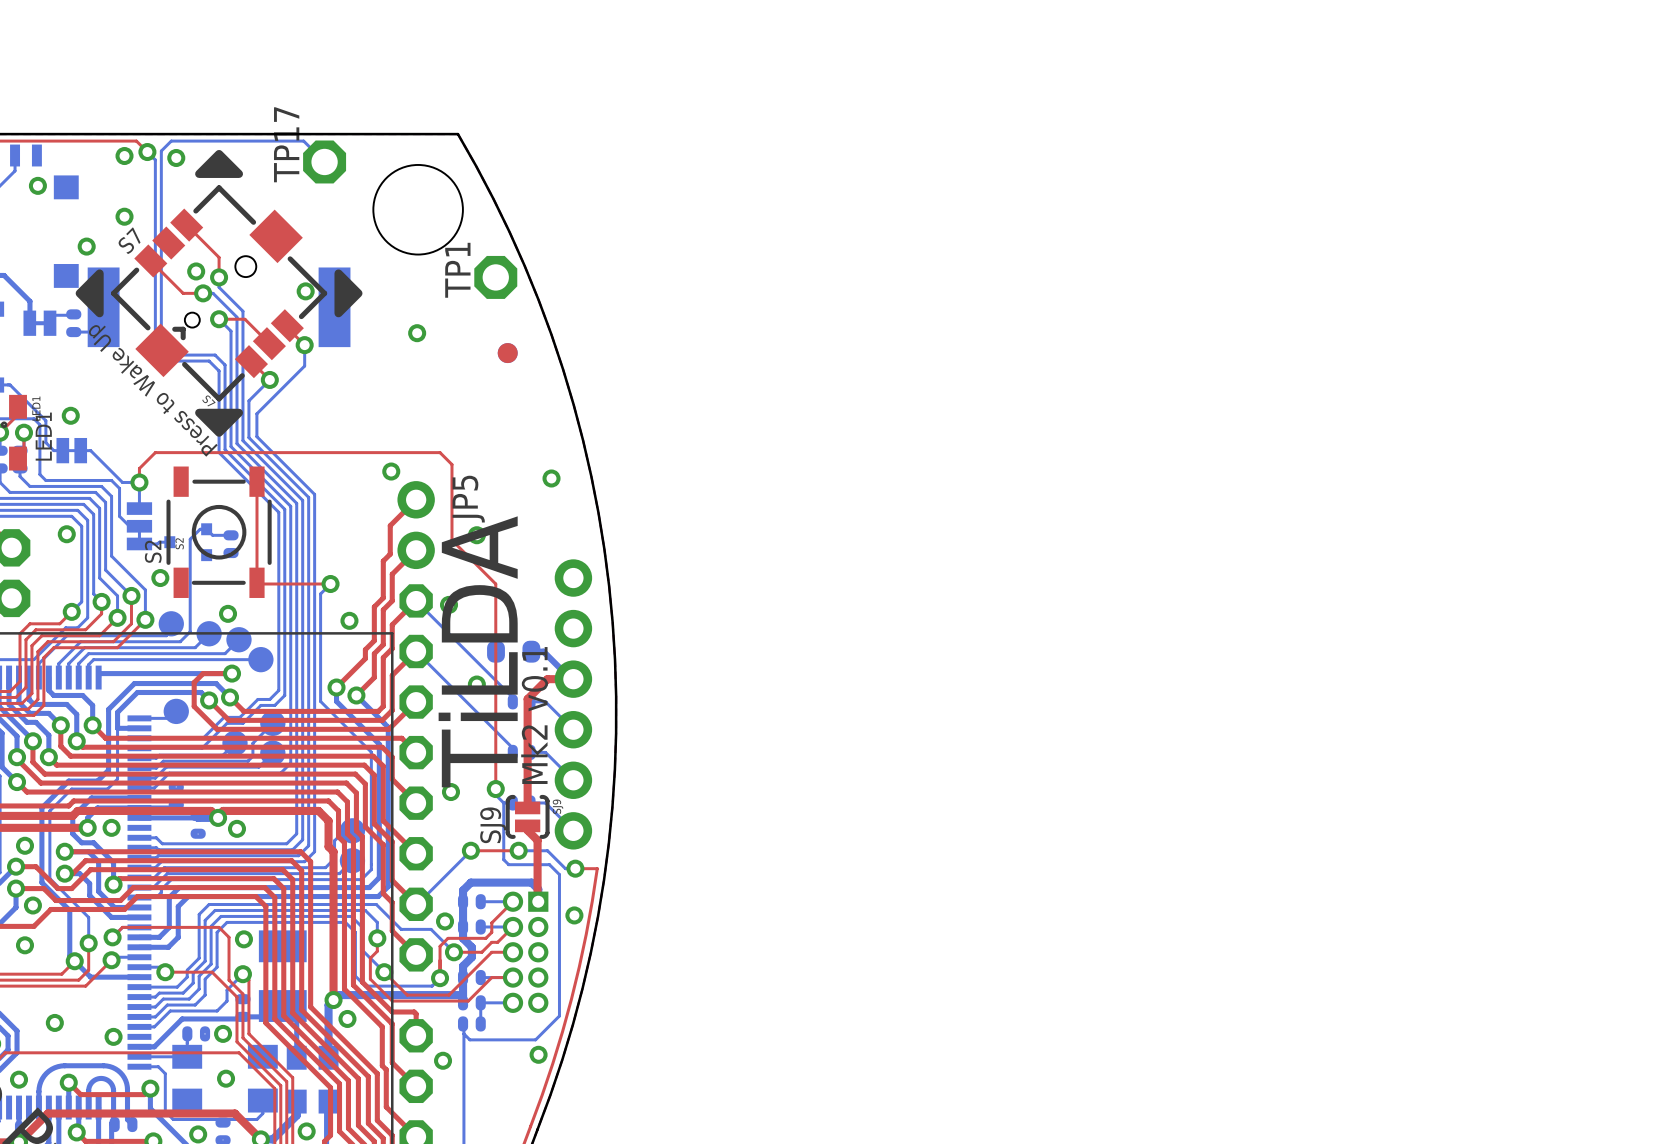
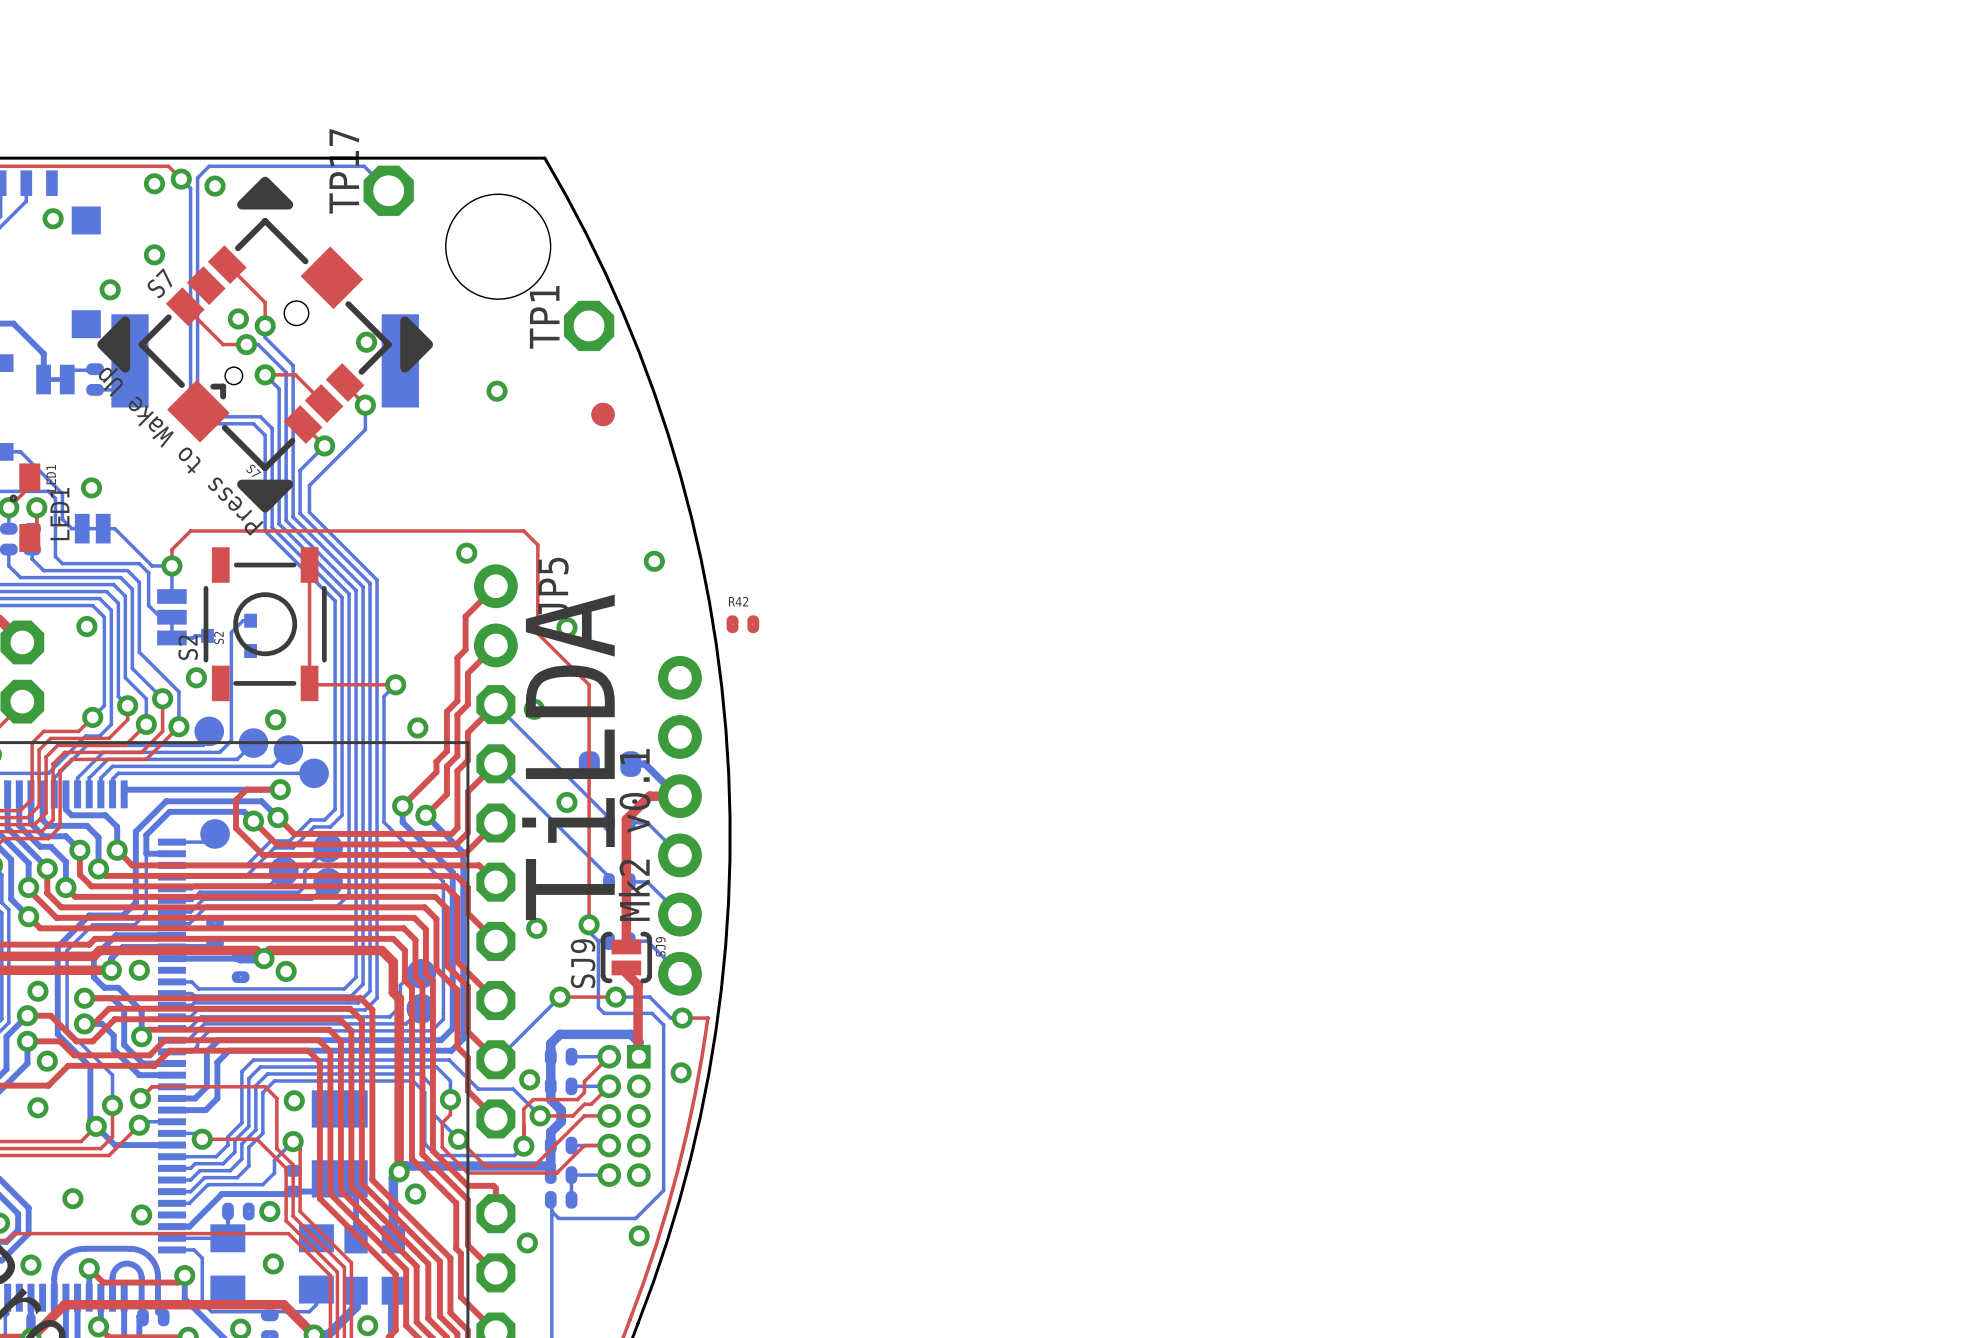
bottom track: (206, 529) (212, 535) (231, 535) -> none
R42 side: bottom (231, 544) -> top (742, 624)

